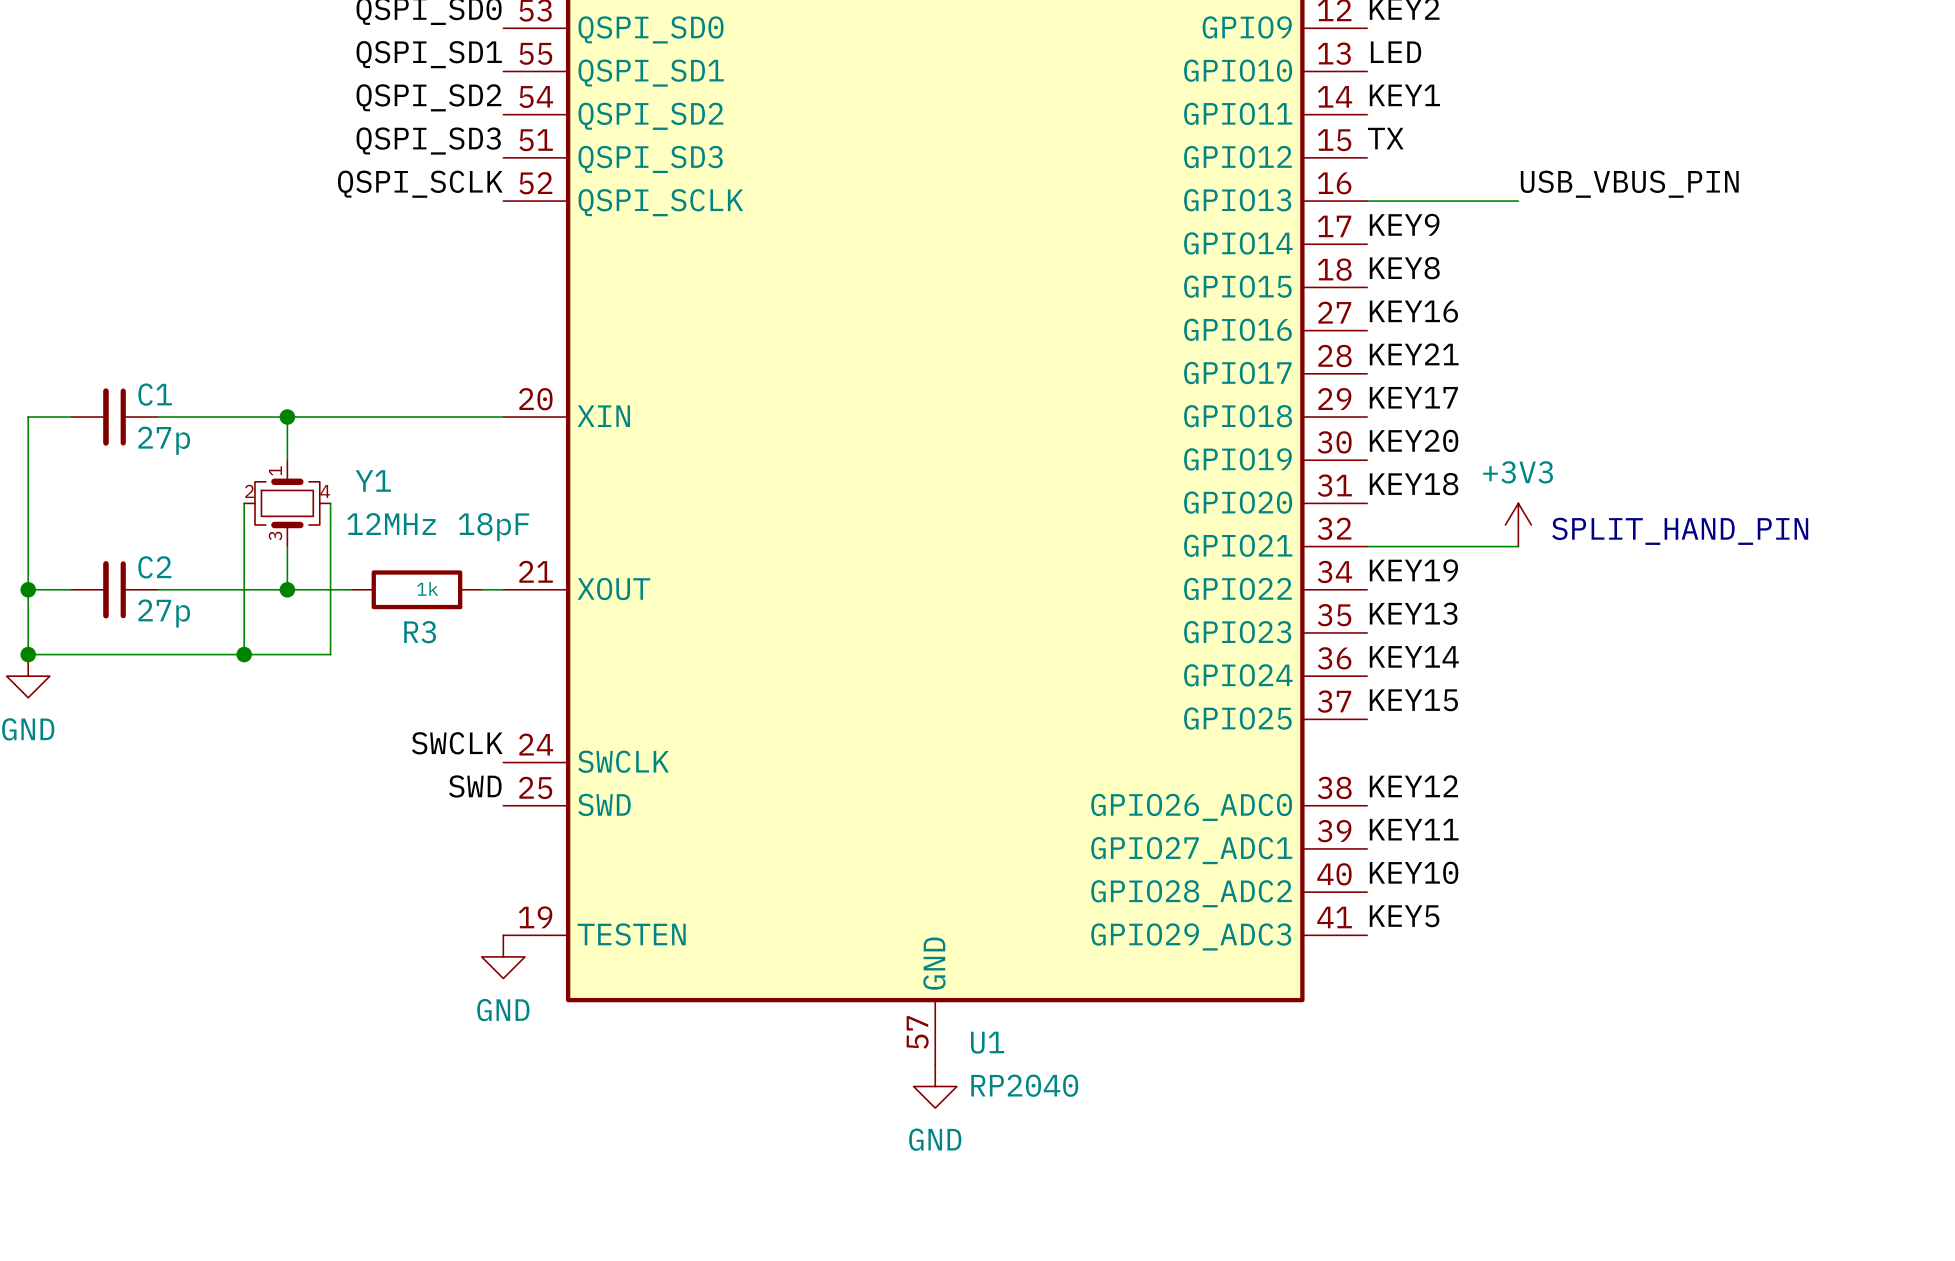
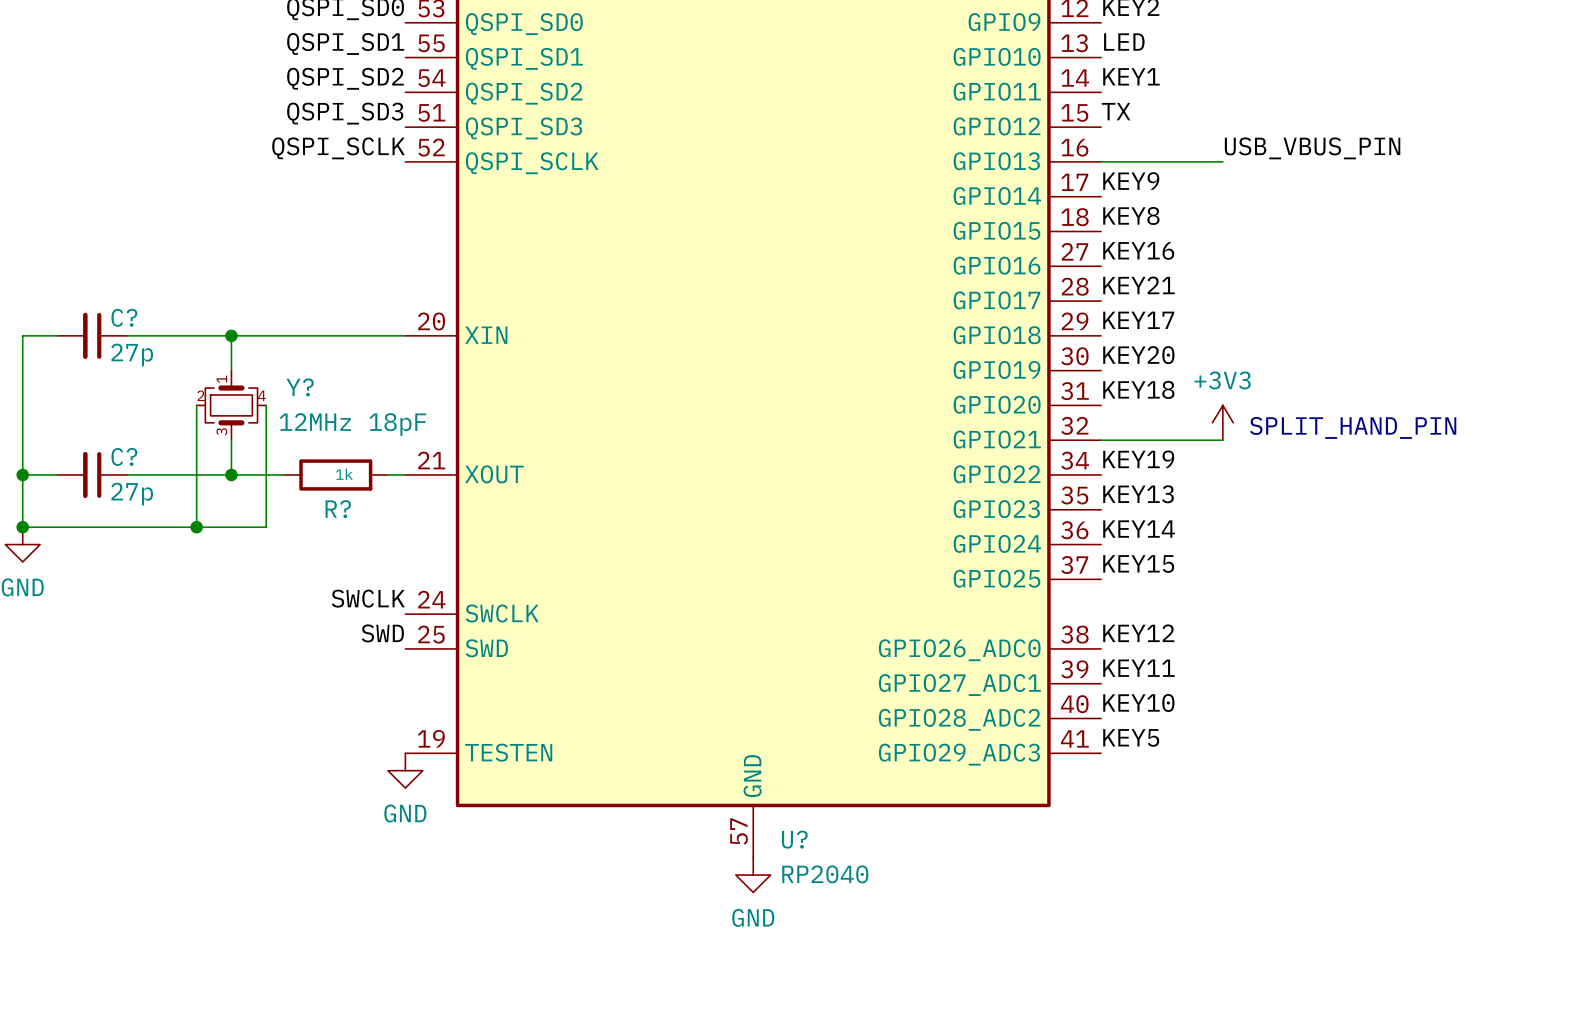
C1 name: C1 (155, 394) -> C? (124, 317)
Y1 name: Y1 (373, 481) -> Y? (300, 387)
C2 name: C2 (154, 567) -> C? (124, 456)
R3 name: R3 (420, 632) -> R? (338, 509)
U1 name: U1 (987, 1042) -> U? (794, 839)

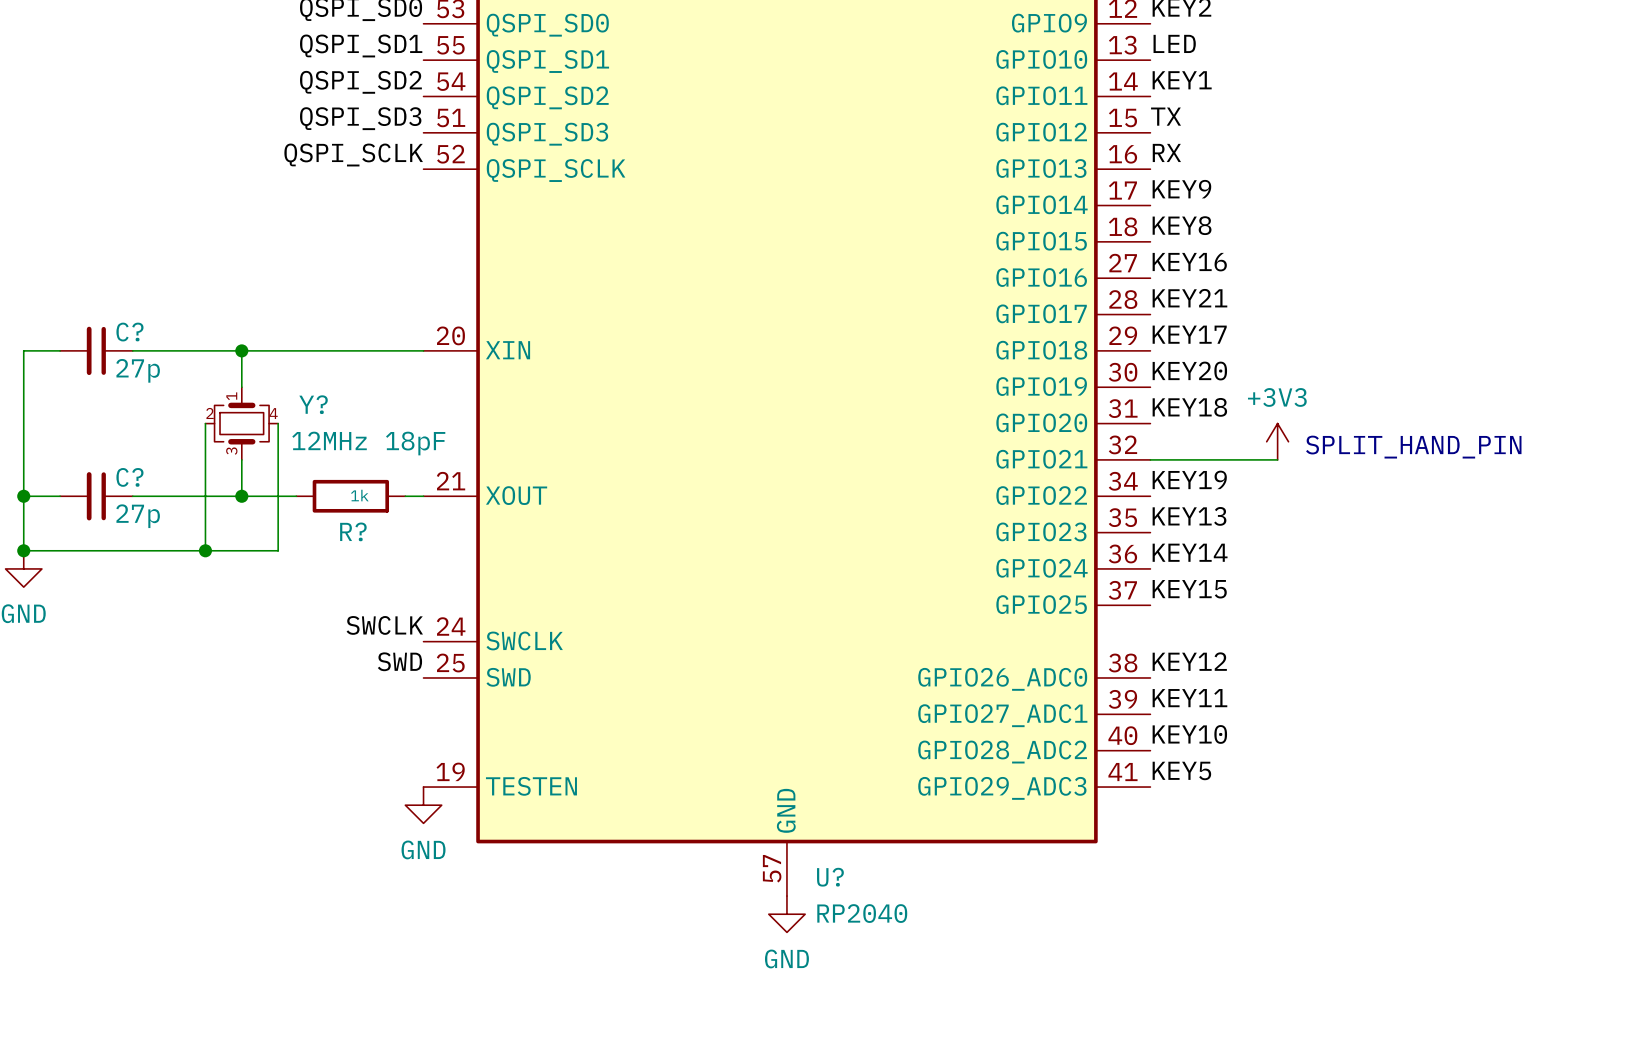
label: none -> RX (1166, 152)
label: USB_VBUS_PIN (1312, 148) -> none
wire: (1101, 161) (1222, 161) -> none

